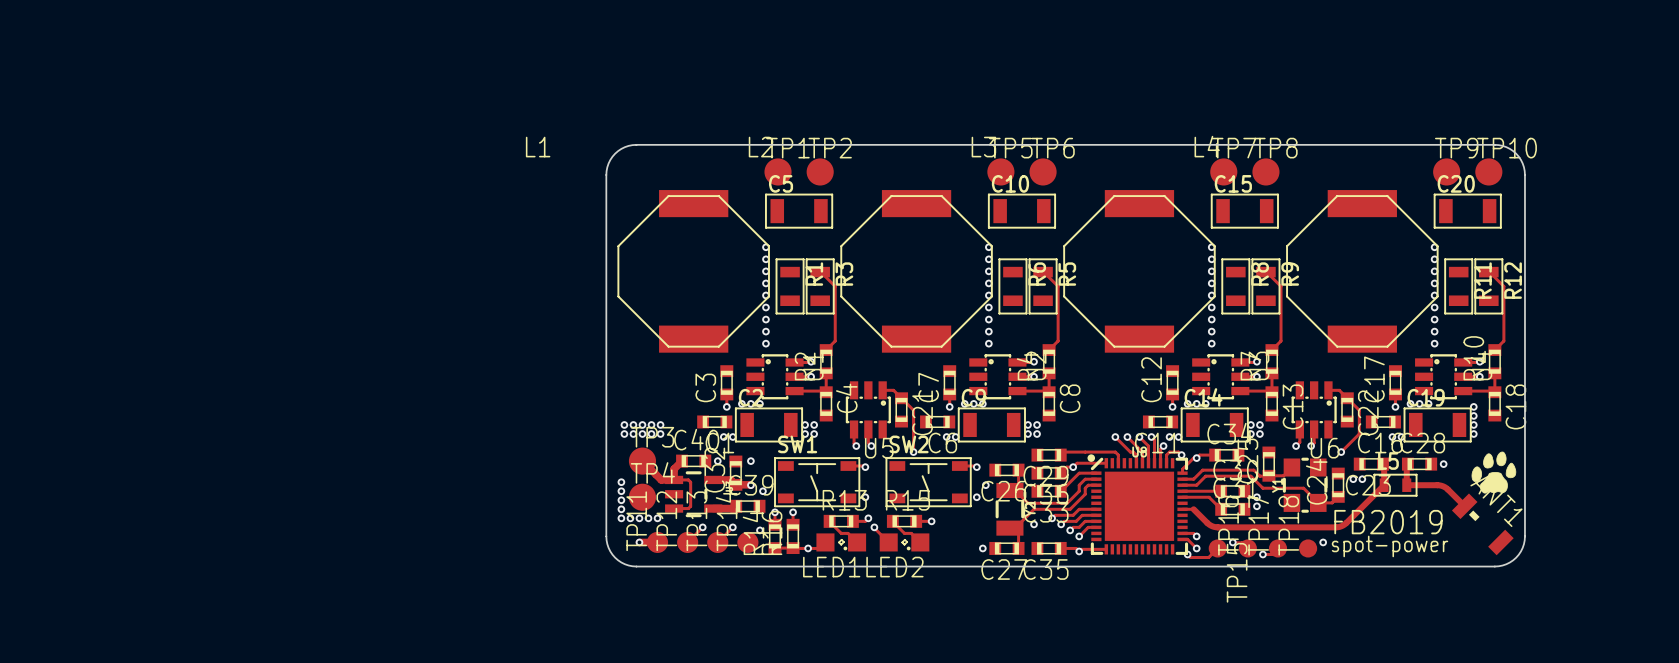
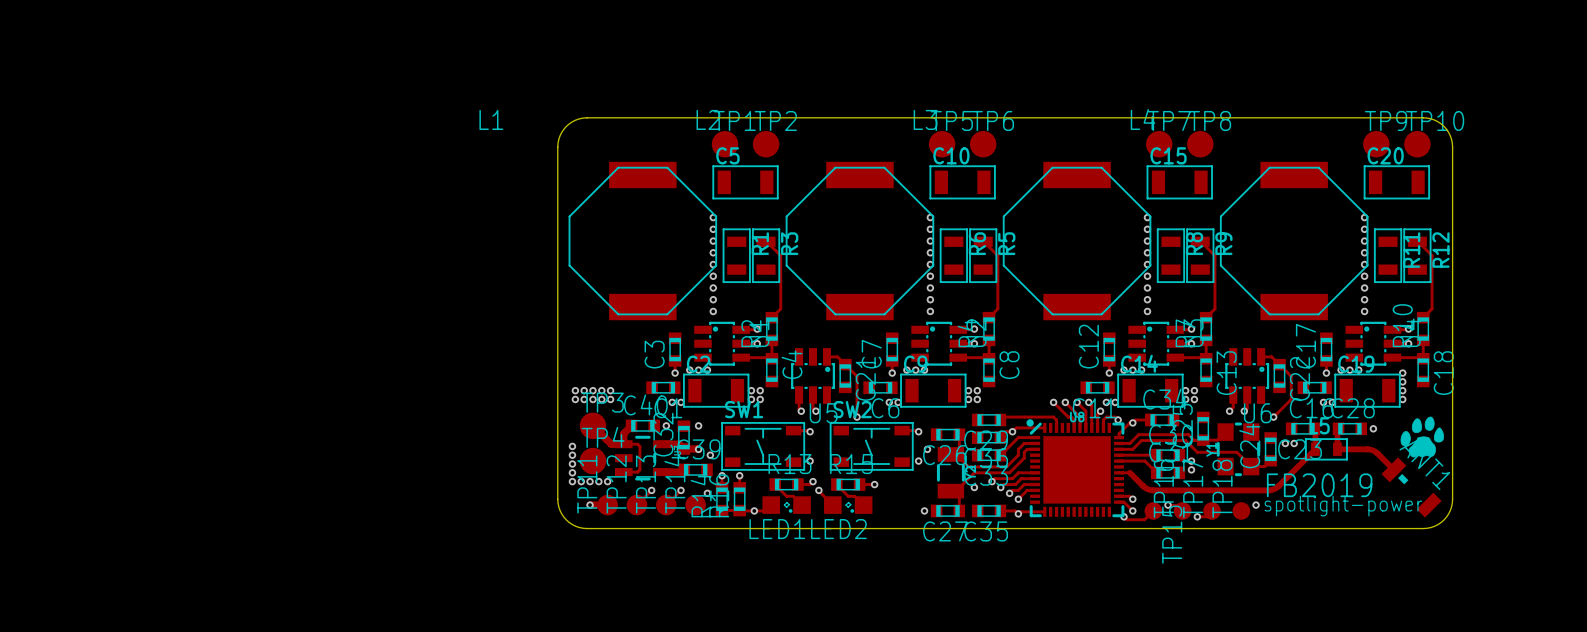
text: spot-power (1390, 546) -> spotlight-power (1343, 506)

